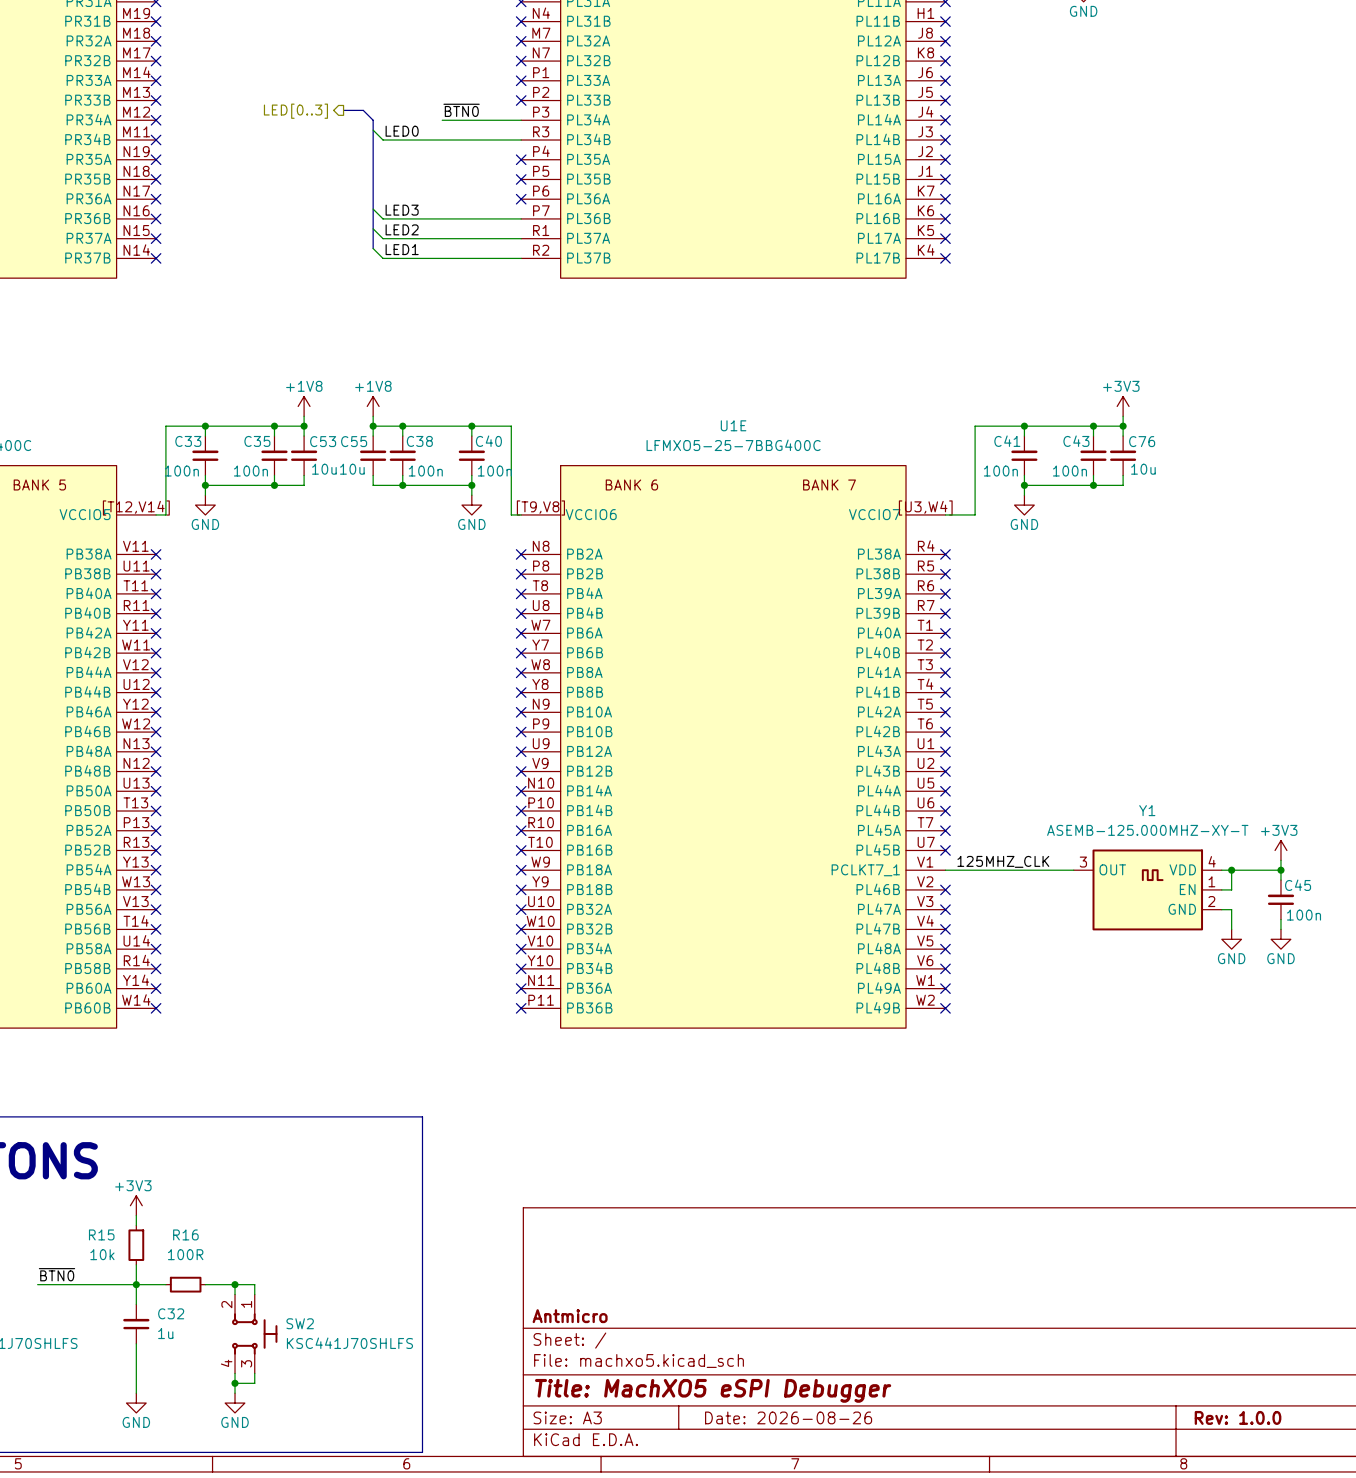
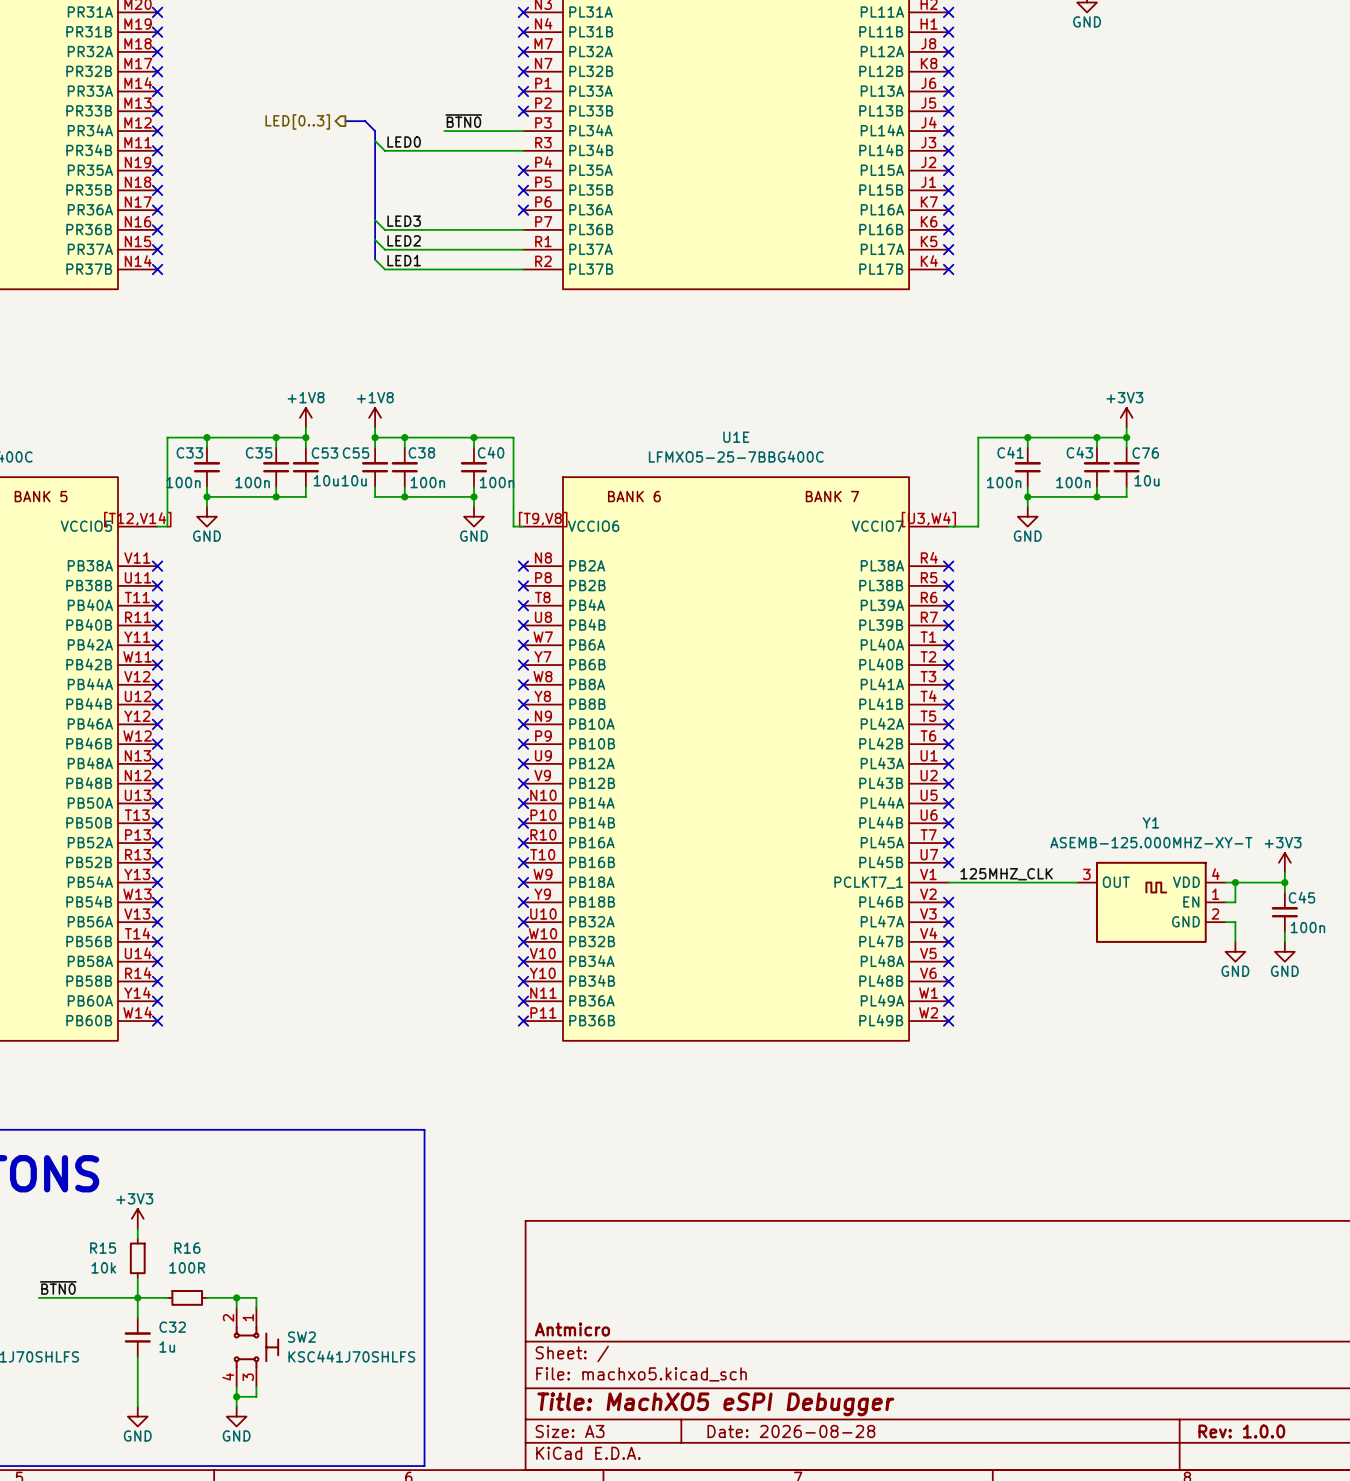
title block: Date: 2026-08-26 (788, 1417) -> Date: 2026-08-28 (791, 1431)

